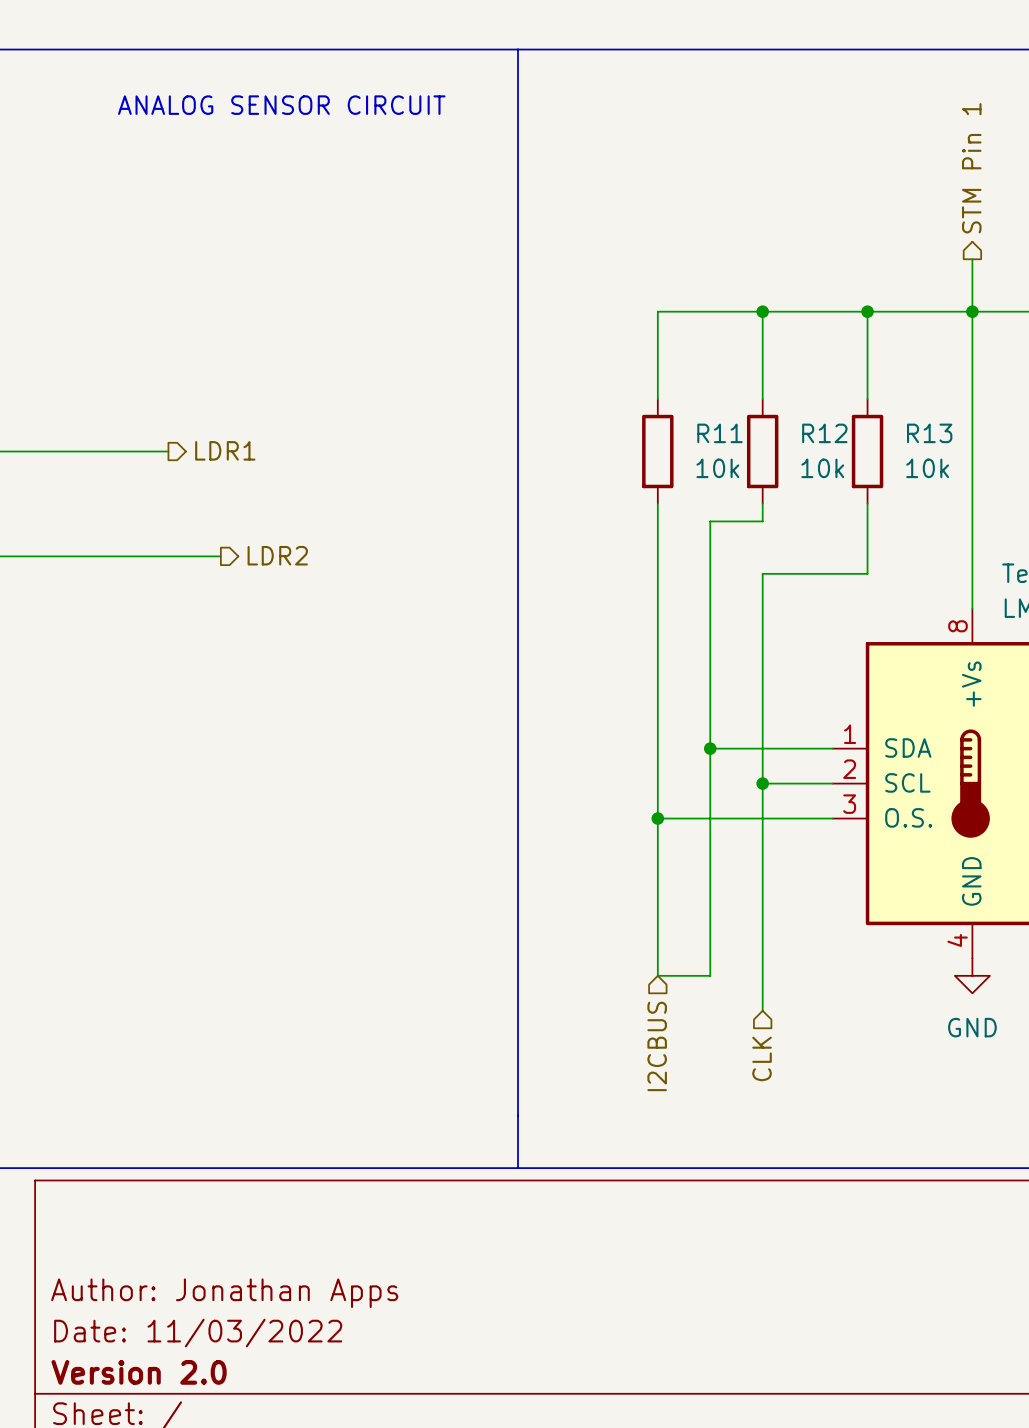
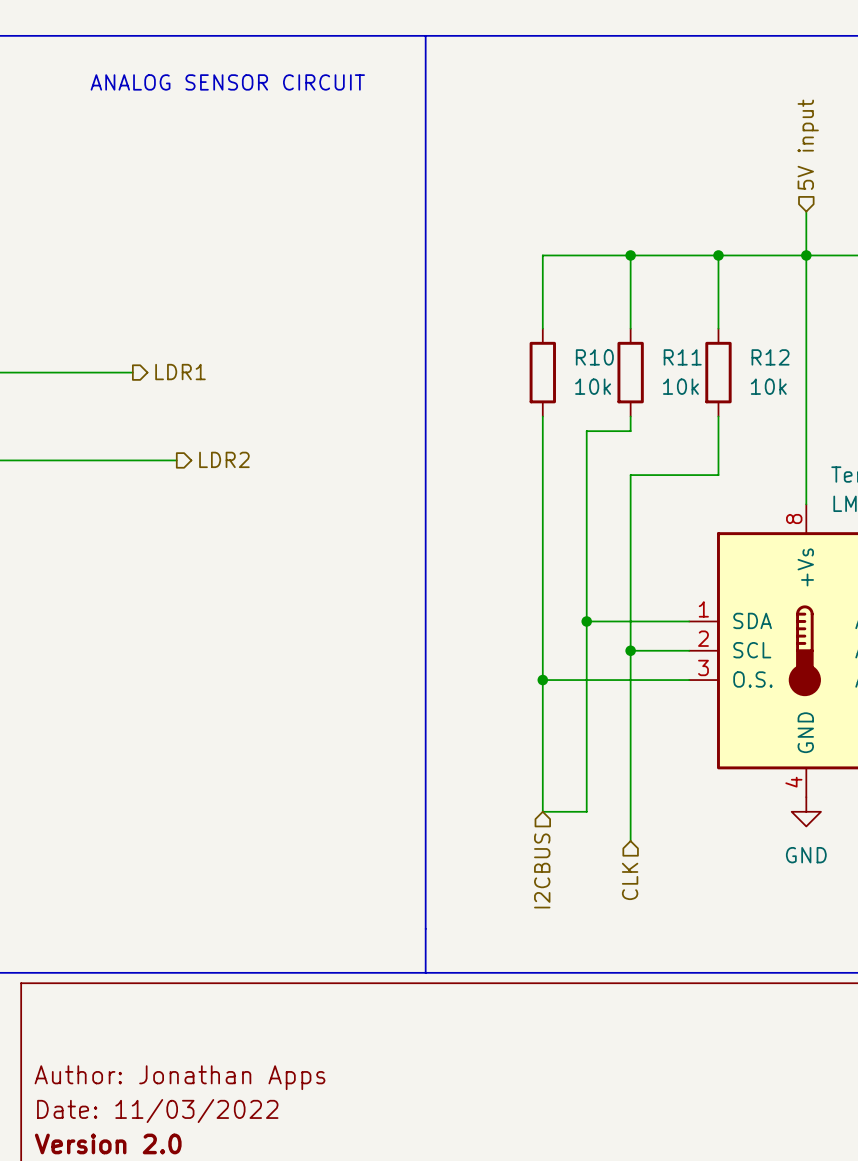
hierarchical label shape: output (971, 168) -> input (808, 144)
hierarchical label: STM Pin 1 (971, 168) -> 5V input (808, 144)
R11 name: R11 (719, 433) -> R10 (594, 357)
R12 name: R12 (824, 433) -> R11 (682, 357)
R13 name: R13 (929, 433) -> R12 (770, 357)

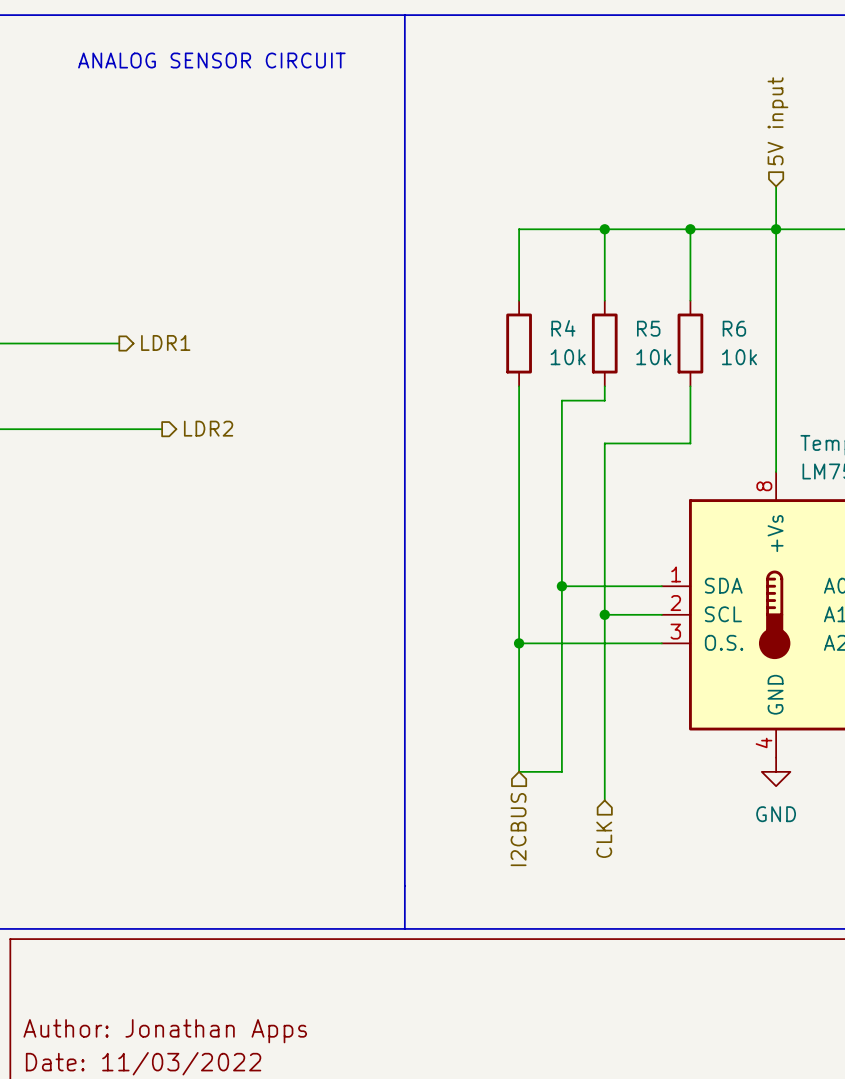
R10 name: R10 (594, 357) -> R4 (563, 328)
R11 name: R11 (682, 357) -> R5 (648, 328)
R12 name: R12 (770, 357) -> R6 (734, 328)

